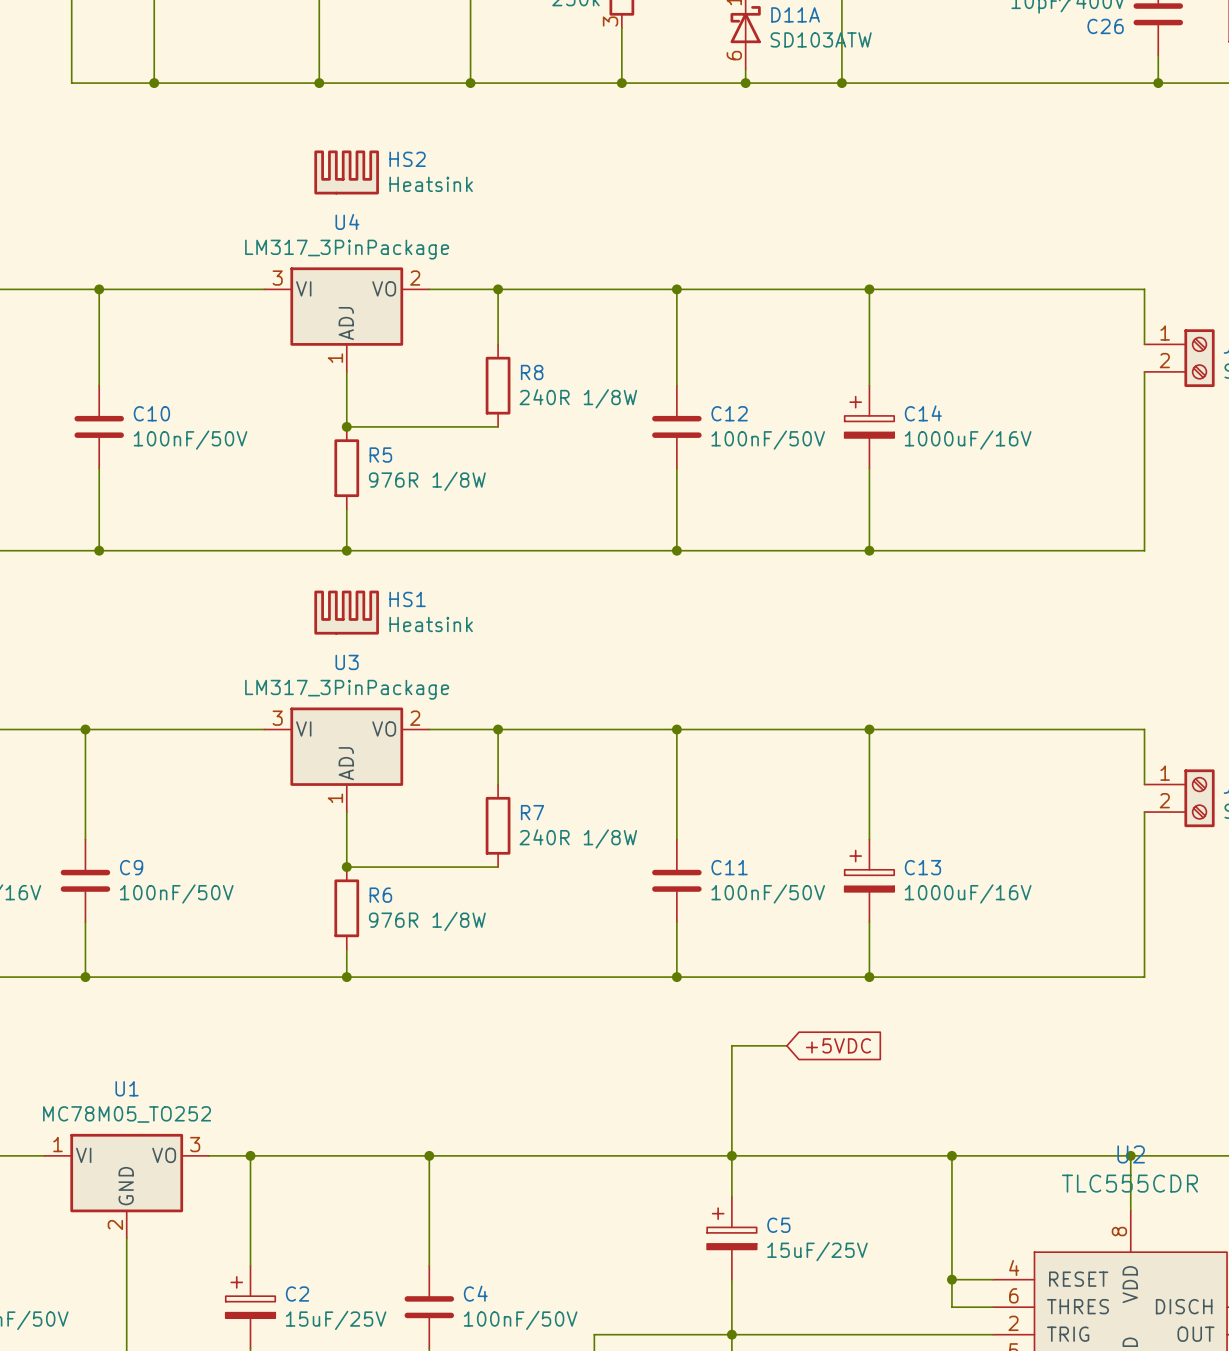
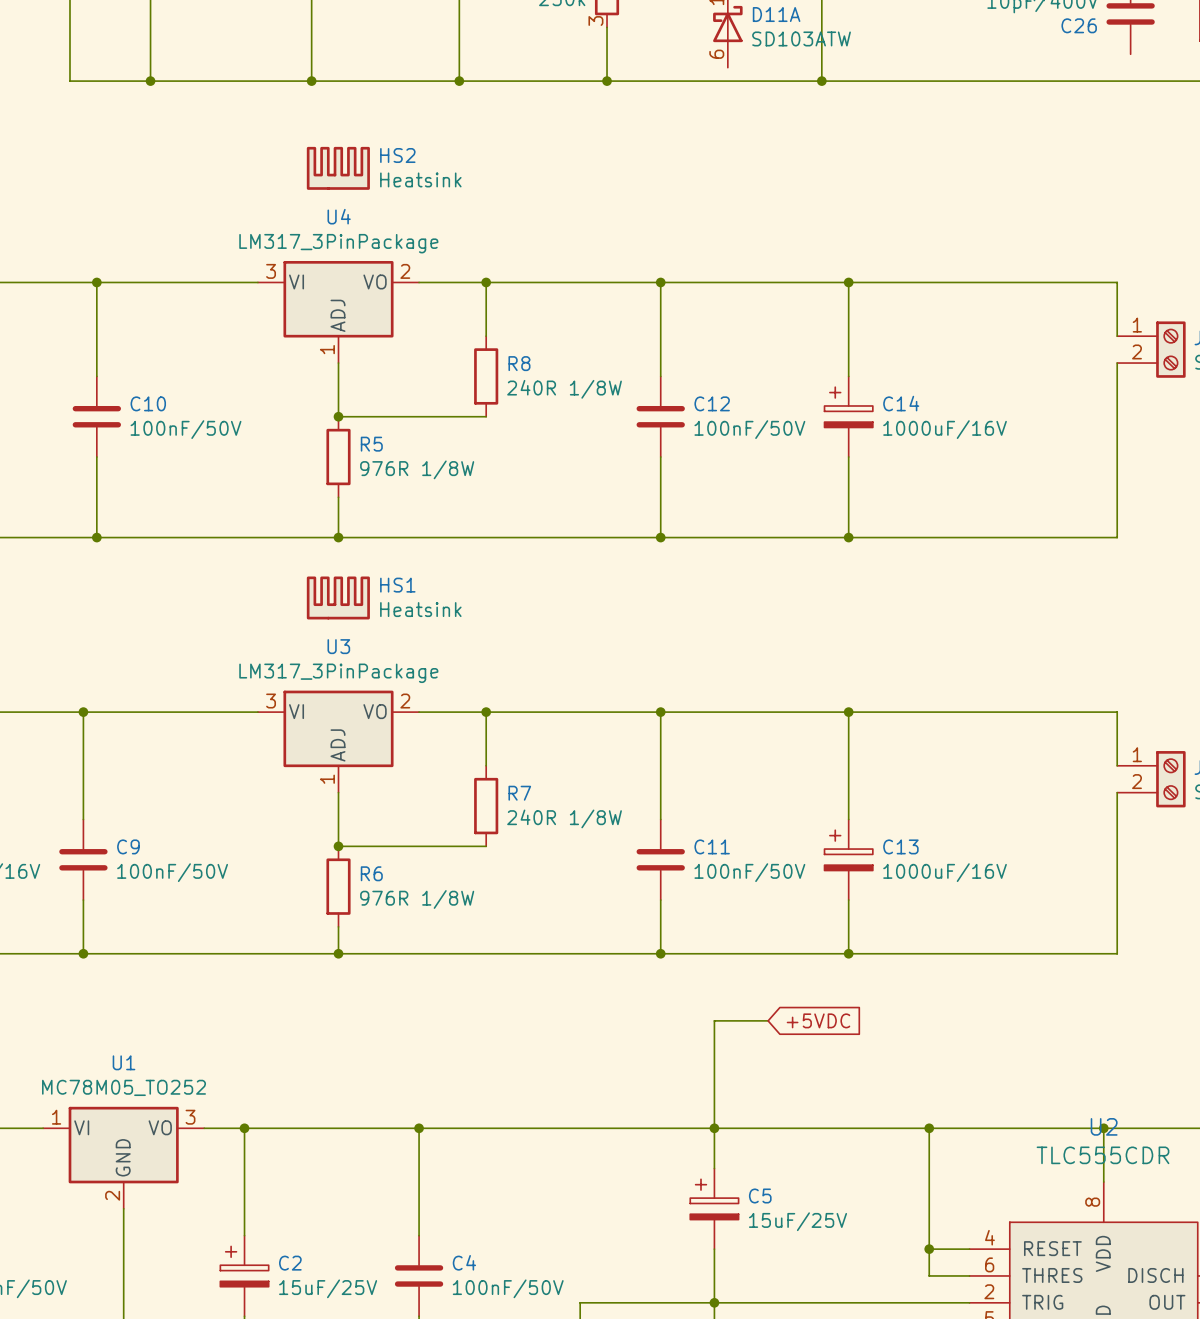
wire: (1158, 55) (1158, 83) -> none
wire: (745, 69) (745, 83) -> none
junction: (745, 83) -> none
junction: (1158, 83) -> none

